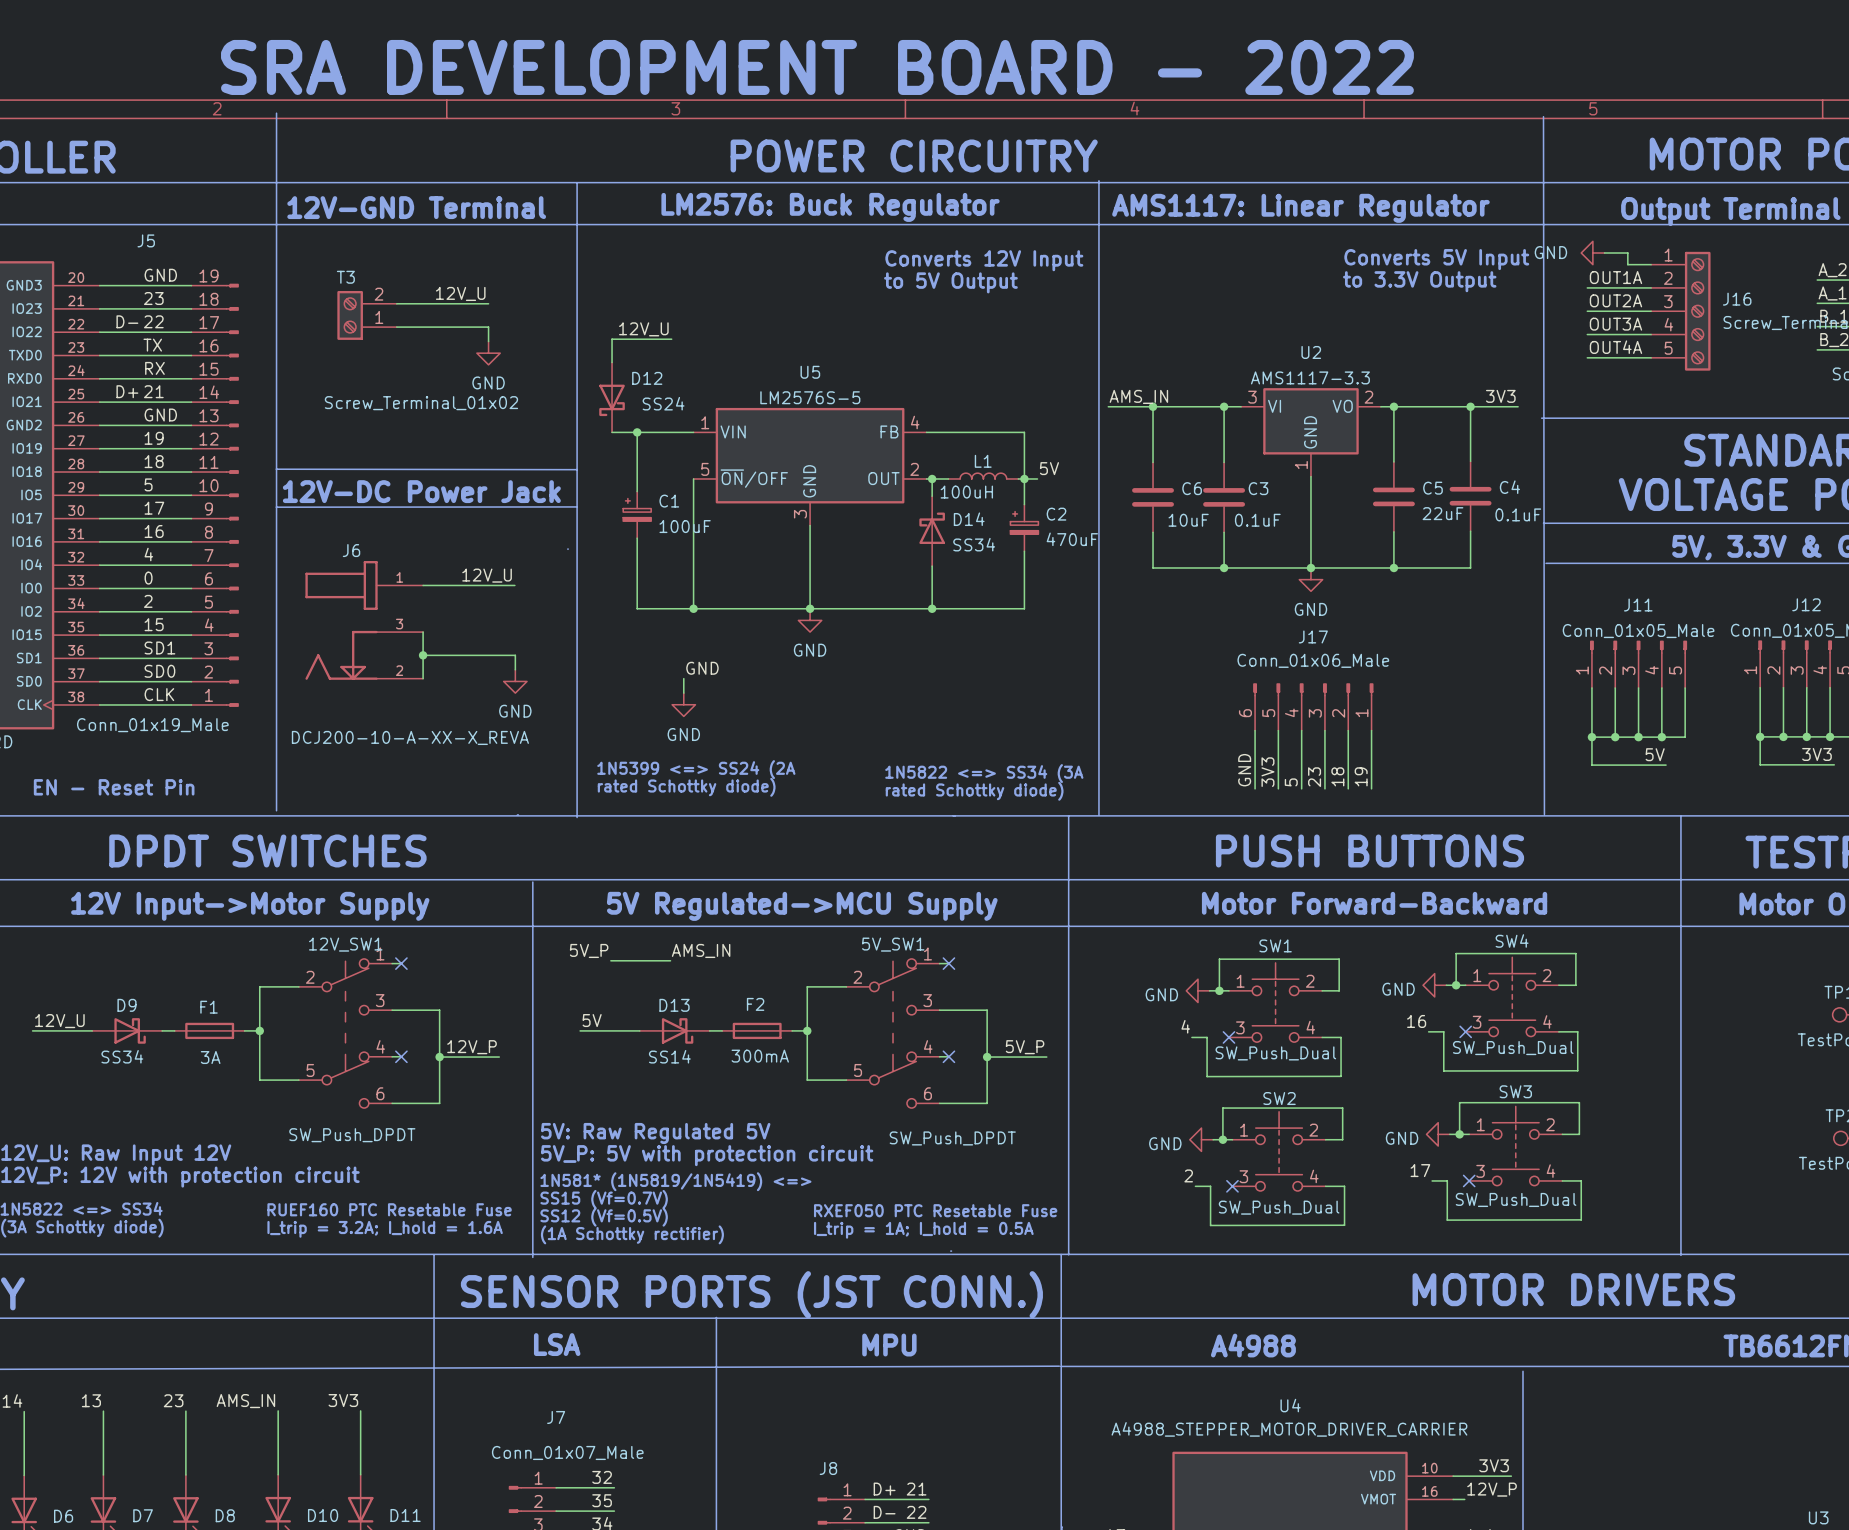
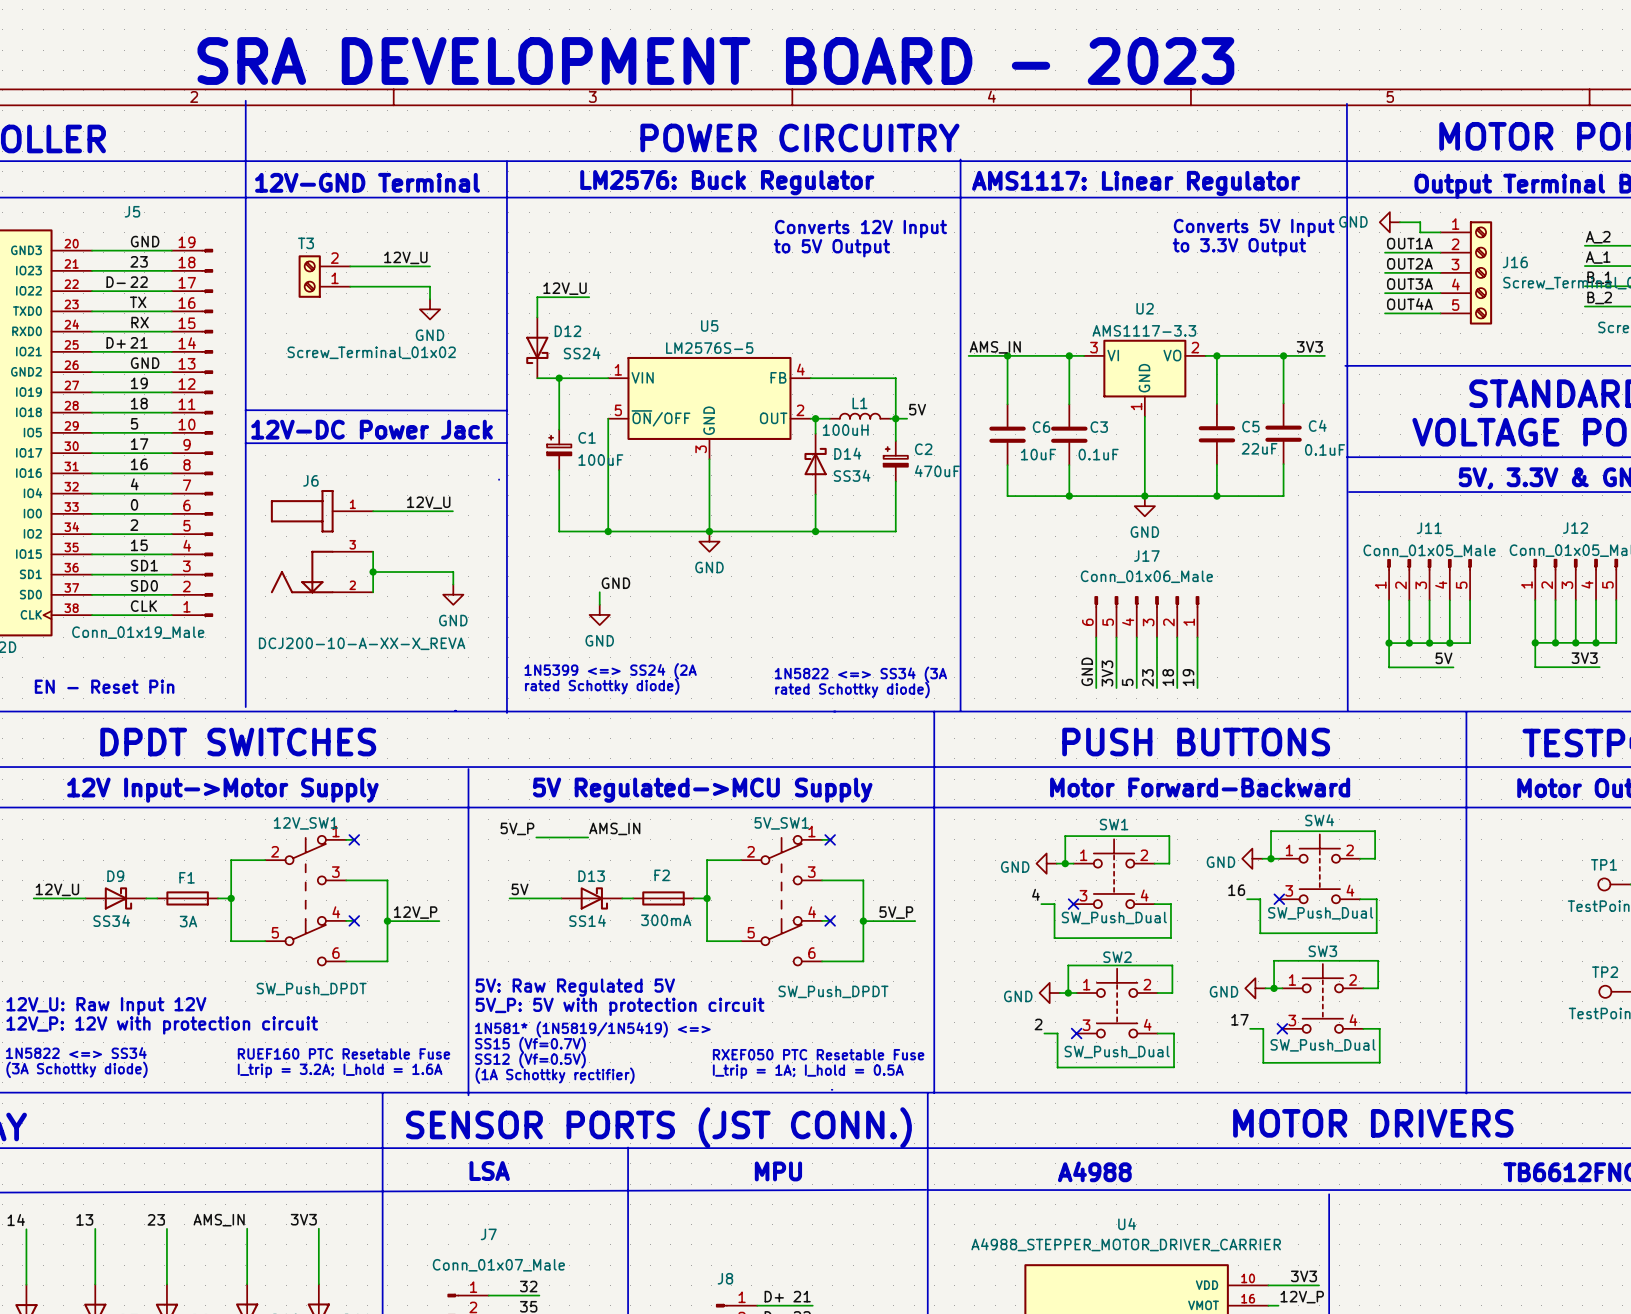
text: SRA DEVELOPMENT BOARD - 2022 (817, 67) -> SRA DEVELOPMENT BOARD - 2023 (715, 61)

